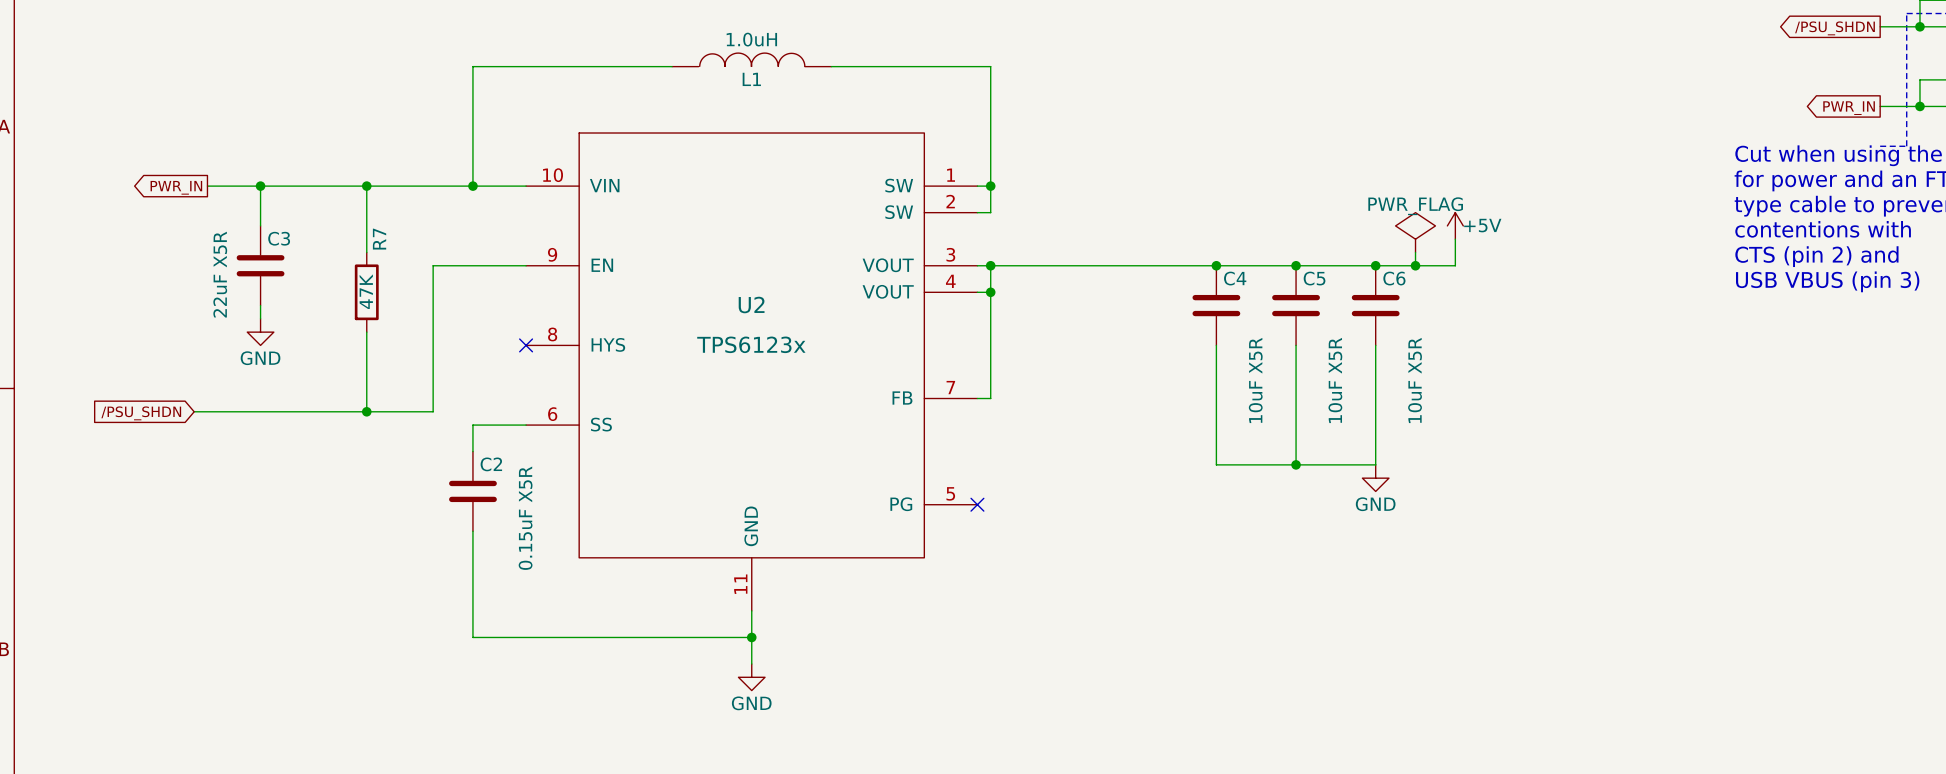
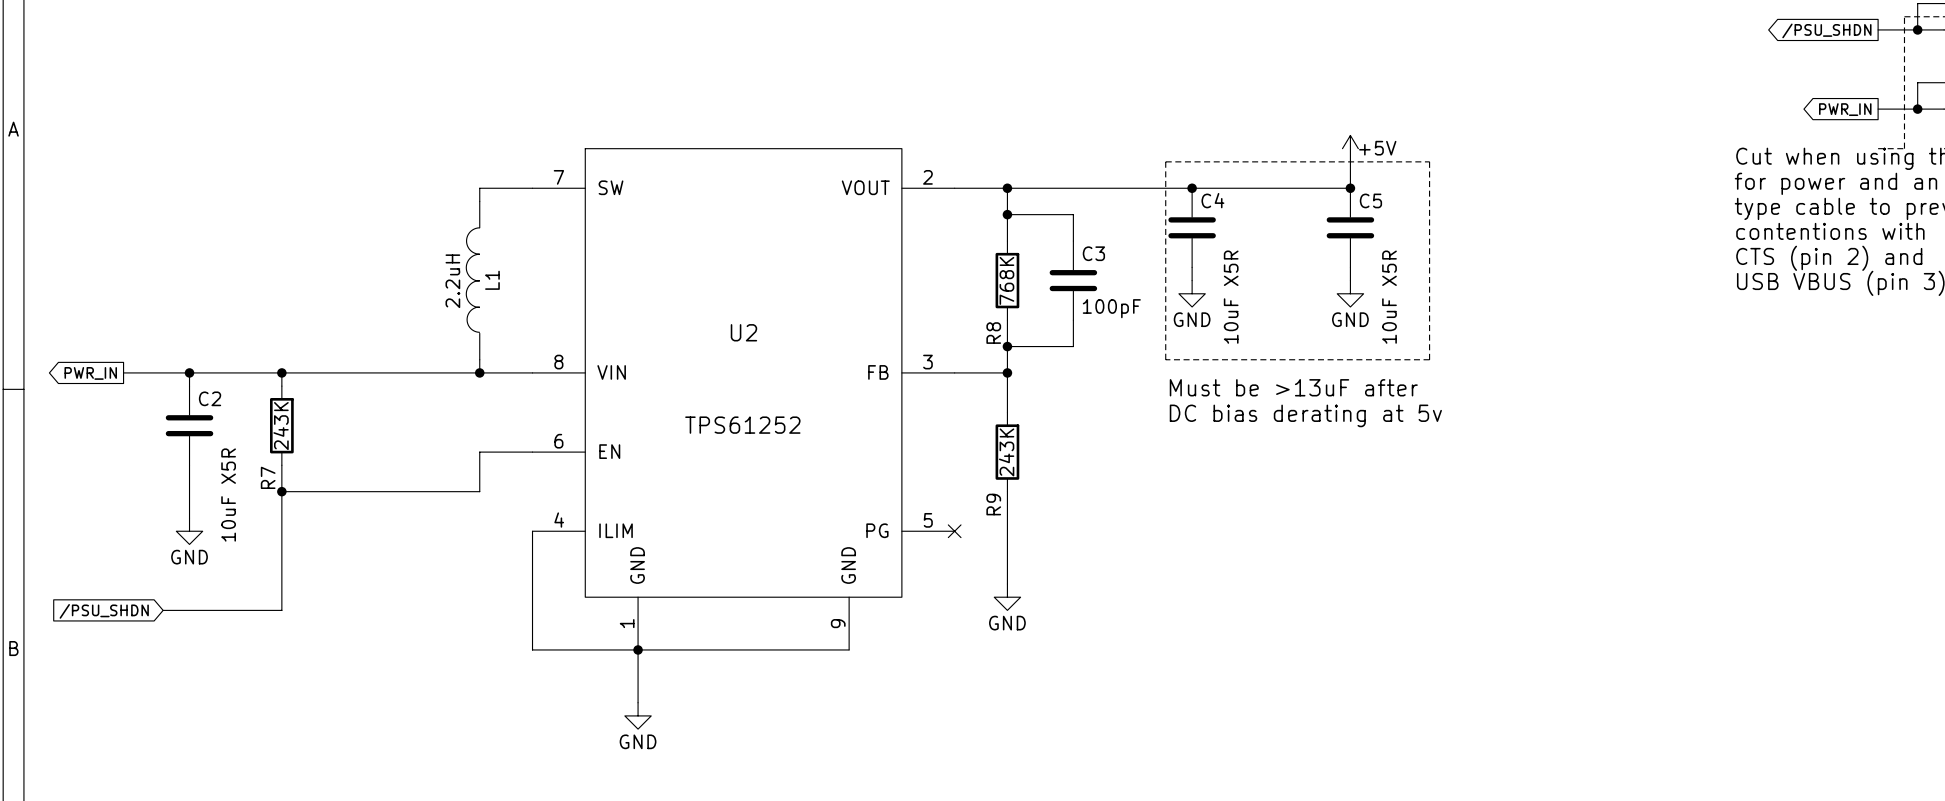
L1 value: 1.0uH (751, 39) -> 2.2uH (452, 281)
L1 position: (751, 59) -> (473, 280)
L1 rotation: 0° (752, 59) -> 90° counterclockwise (472, 280)
wire: (672, 66) (472, 66) (472, 186) (207, 186) -> none
wire: (831, 66) (990, 66) (990, 212) (977, 212) -> none
U2 symbol: [526, 133, 978, 611] -> [532, 148, 955, 650]
line: none -> (1165, 161) (1429, 161) (1429, 359) (1165, 359) (1165, 161)
wire: none -> (1350, 161) (1350, 188) (994, 188)
wire: (260, 186) (260, 225) -> none
junction: (260, 186) -> none
wire: (366, 186) (366, 252) -> none
junction: (366, 186) -> none
wire: none -> (479, 188) (479, 201)
junction: (472, 186) -> none
junction position: (990, 186) -> (1007, 188)
wire: none -> (1007, 188) (1007, 241)
junction: none -> (1192, 188)
junction: none -> (1350, 188)
global label position: PWR_IN (176, 187) -> PWR_IN (90, 373)
wire: none -> (1007, 214) (1073, 214) (1073, 241)
junction: none -> (1007, 214)
power symbol position: +5V (1455, 225) -> +5V (1350, 148)
power symbol: PWR_FLAG (1415, 232) -> none
R7 name position: R7 (379, 239) -> R7 (268, 477)
wire: (1455, 239) (1455, 265) (977, 265) -> none
wire: (1415, 252) (1415, 265) -> (1350, 267) (1350, 280)
C3 position: (260, 265) -> (1073, 280)
wire: (526, 265) (433, 265) (433, 411) (194, 411) -> none
wire: (990, 265) (990, 398) (977, 398) -> none
junction: (990, 265) -> none
wire: none -> (1192, 267) (1192, 280)
junction: (1216, 265) -> none
junction: (1296, 265) -> none
junction: (1375, 265) -> none
junction: (1415, 265) -> none
C3 value: 22uF X5R (220, 274) -> 100pF (1111, 308)
R8: none -> 768K (1007, 280)
R7 value: 47K (366, 291) -> 243K (281, 426)
R7 position: (366, 292) -> (281, 425)
wire: (977, 292) (990, 292) -> none
junction: (990, 292) -> none
power symbol: none -> GND (1192, 293)
power symbol: none -> GND (1350, 293)
wire: (260, 305) (260, 318) -> (281, 372) (281, 386)
C4 position: (1216, 305) -> (1192, 227)
C5 position: (1296, 305) -> (1350, 227)
C6: 10uF X5R (1375, 305) -> none
wire: none -> (1007, 320) (1007, 412)
wire: none -> (1073, 320) (1073, 346) (1007, 346)
power symbol position: GND (260, 332) -> GND (189, 531)
wire: (366, 332) (366, 411) -> none
U2 value: TPS6123x (751, 344) -> TPS61252 (742, 425)
no-connect mark: (526, 345) -> none
junction: none -> (1007, 346)
wire: (1216, 345) (1216, 464) (1375, 464) (1375, 345) -> none
wire: (1296, 345) (1296, 464) -> none
wire: none -> (479, 359) (479, 372)
wire: none -> (123, 372) (532, 372)
wire: none -> (189, 372) (189, 386)
junction: none -> (189, 372)
junction: none -> (281, 372)
junction: none -> (479, 372)
wire: none -> (954, 372) (1007, 372)
junction: none -> (1007, 372)
text: none -> Must be >13uF after (1293, 387)
junction: (366, 411) -> none
global label position: /PSU_SHDN (141, 413) -> /PSU_SHDN (104, 611)
text: none -> DC bias derating at 5v (1305, 415)
wire: (526, 425) (472, 425) (472, 451) -> none
wire: none -> (532, 452) (479, 452) (479, 491) (281, 491)
R9: none -> 243K (1007, 452)
wire: none -> (189, 465) (189, 518)
wire: none -> (281, 465) (281, 610) (163, 610)
junction: (1296, 464) -> none
power symbol: GND (1375, 478) -> none
junction: none -> (281, 491)
C2 position: (472, 491) -> (189, 425)
wire: none -> (1007, 491) (1007, 584)
no-connect mark position: (977, 504) -> (954, 531)
C2 value: 0.15uF X5R (525, 518) -> 10uF X5R (228, 495)
wire: (472, 531) (472, 637) (751, 637) -> none
wire: none -> (532, 531) (532, 649) (849, 649)
power symbol: none -> GND (1007, 597)
wire: (751, 610) (751, 664) -> (638, 649) (638, 702)
junction: (751, 637) -> none
junction: none -> (638, 649)
power symbol position: GND (751, 677) -> GND (638, 715)

